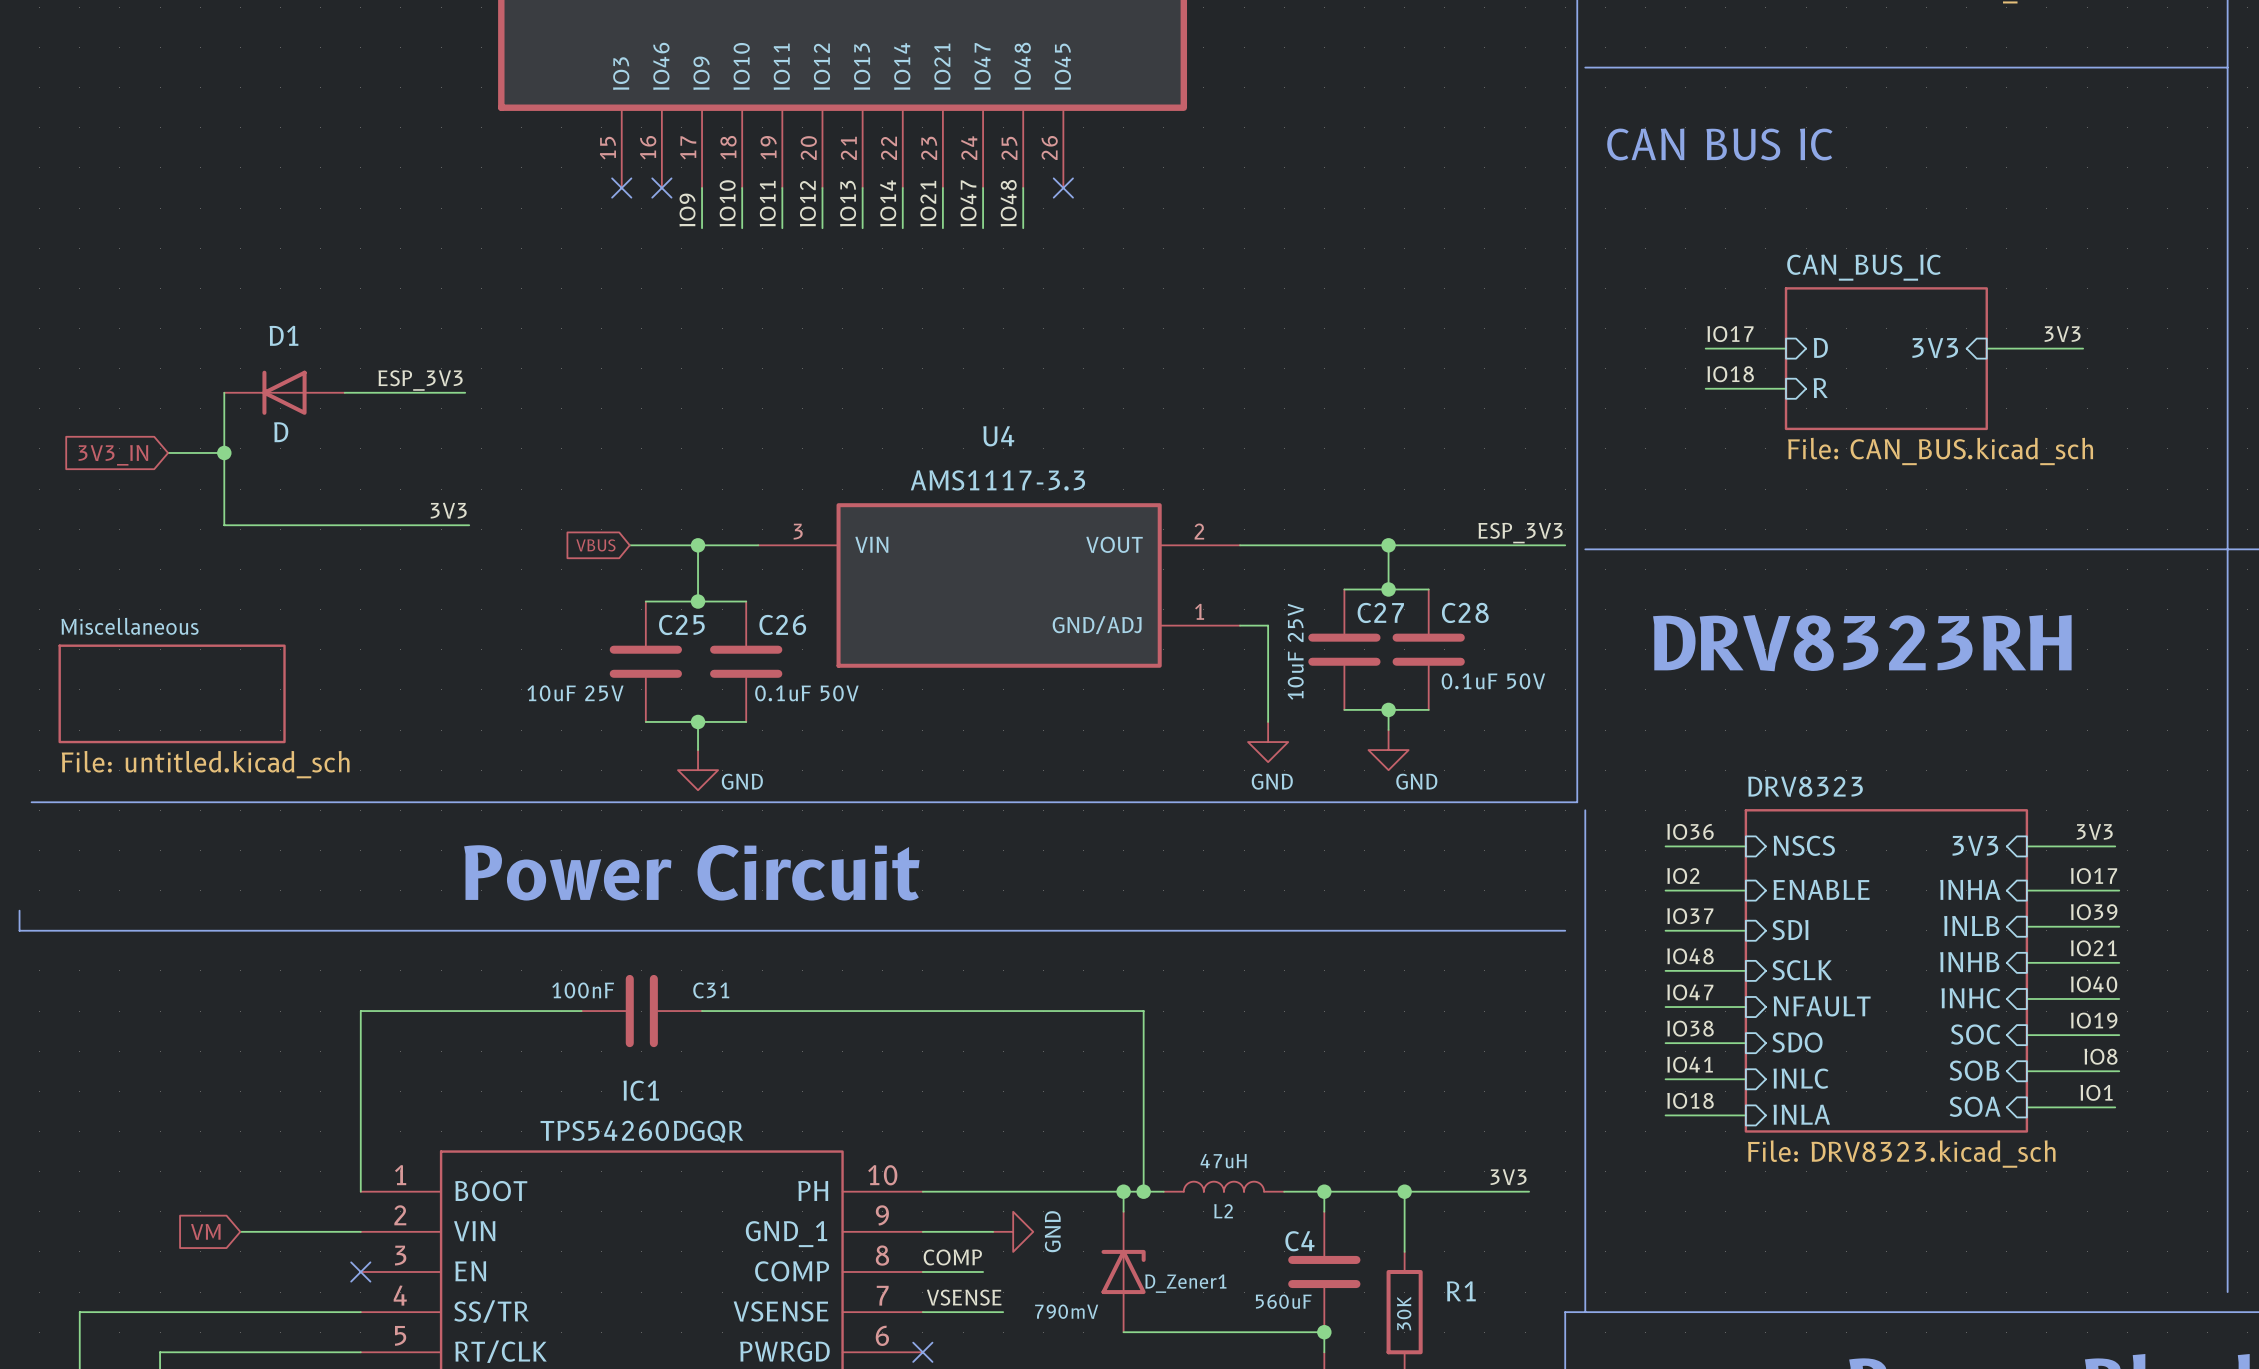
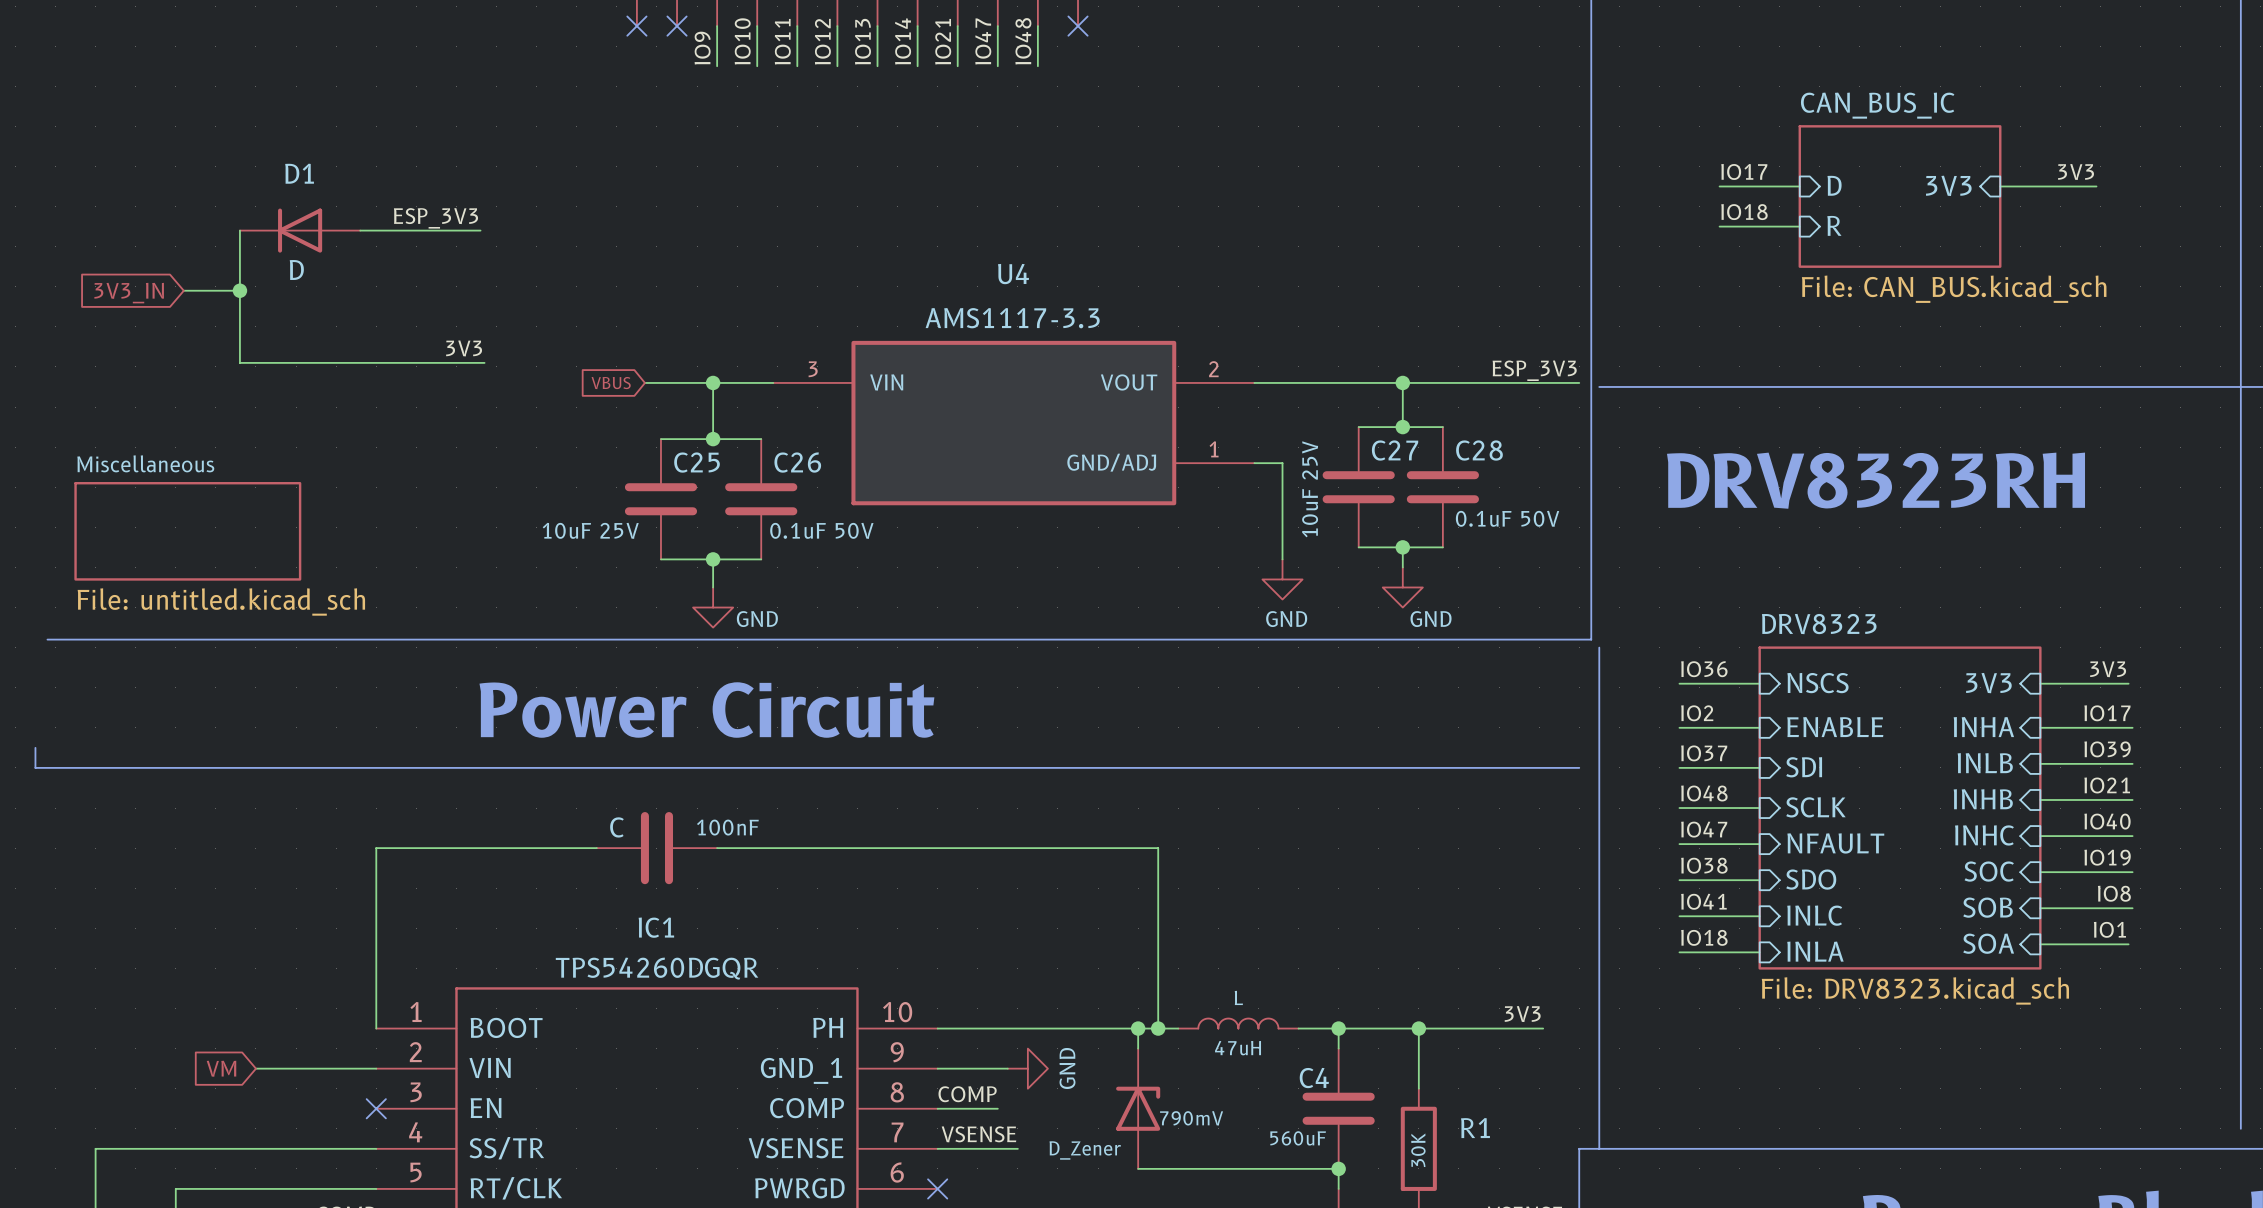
C31 value: 100nF (583, 990) -> C (616, 827)
C31 name: C31 (711, 990) -> 100nF (727, 827)
L2 value: 47uH (1223, 1161) -> L (1238, 997)
L2 name: L2 (1223, 1211) -> 47uH (1238, 1048)
D_Zener1 name: D_Zener1 (1185, 1283) -> 790mV (1191, 1118)
D_Zener1 value: 790mV (1066, 1311) -> D_Zener (1085, 1150)

